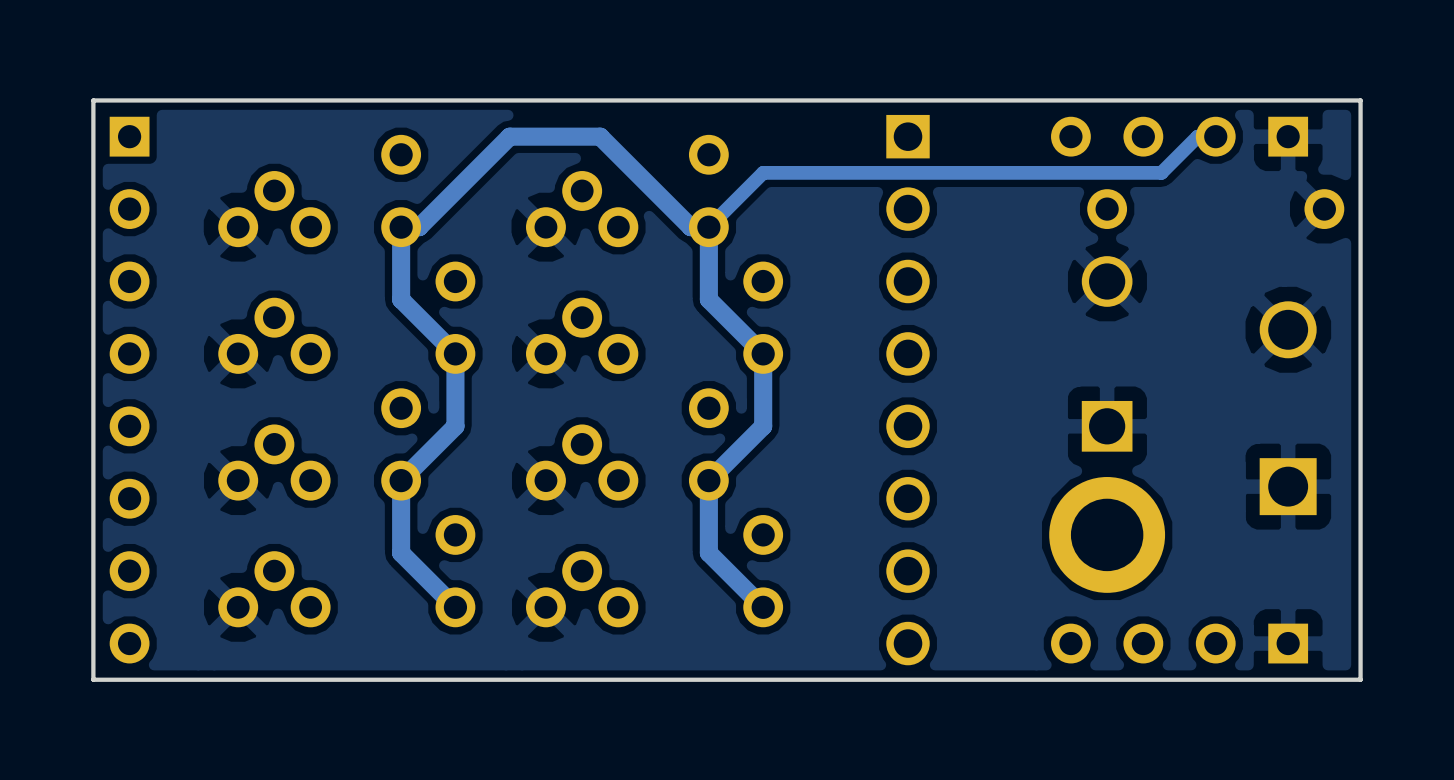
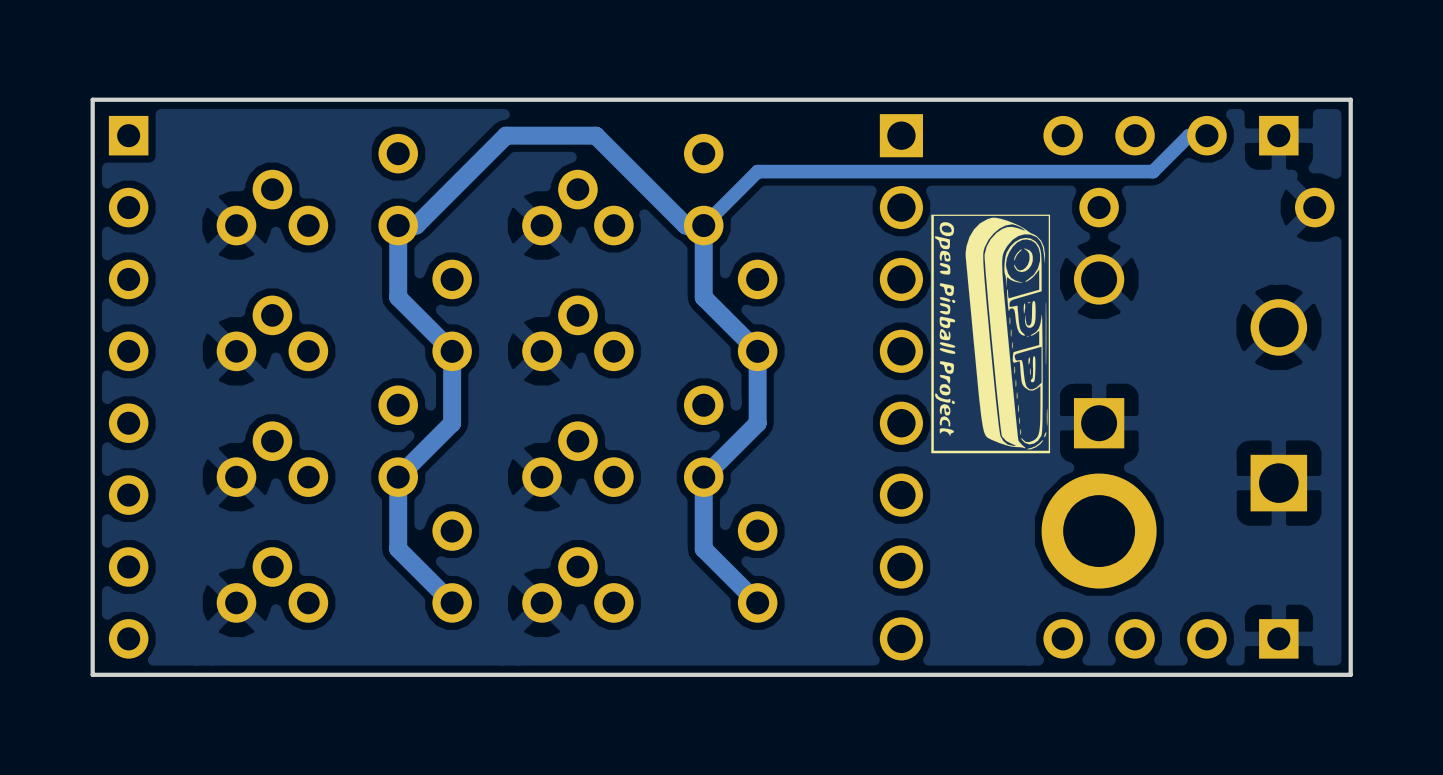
drawing: none -> [931, 214, 1051, 454]

